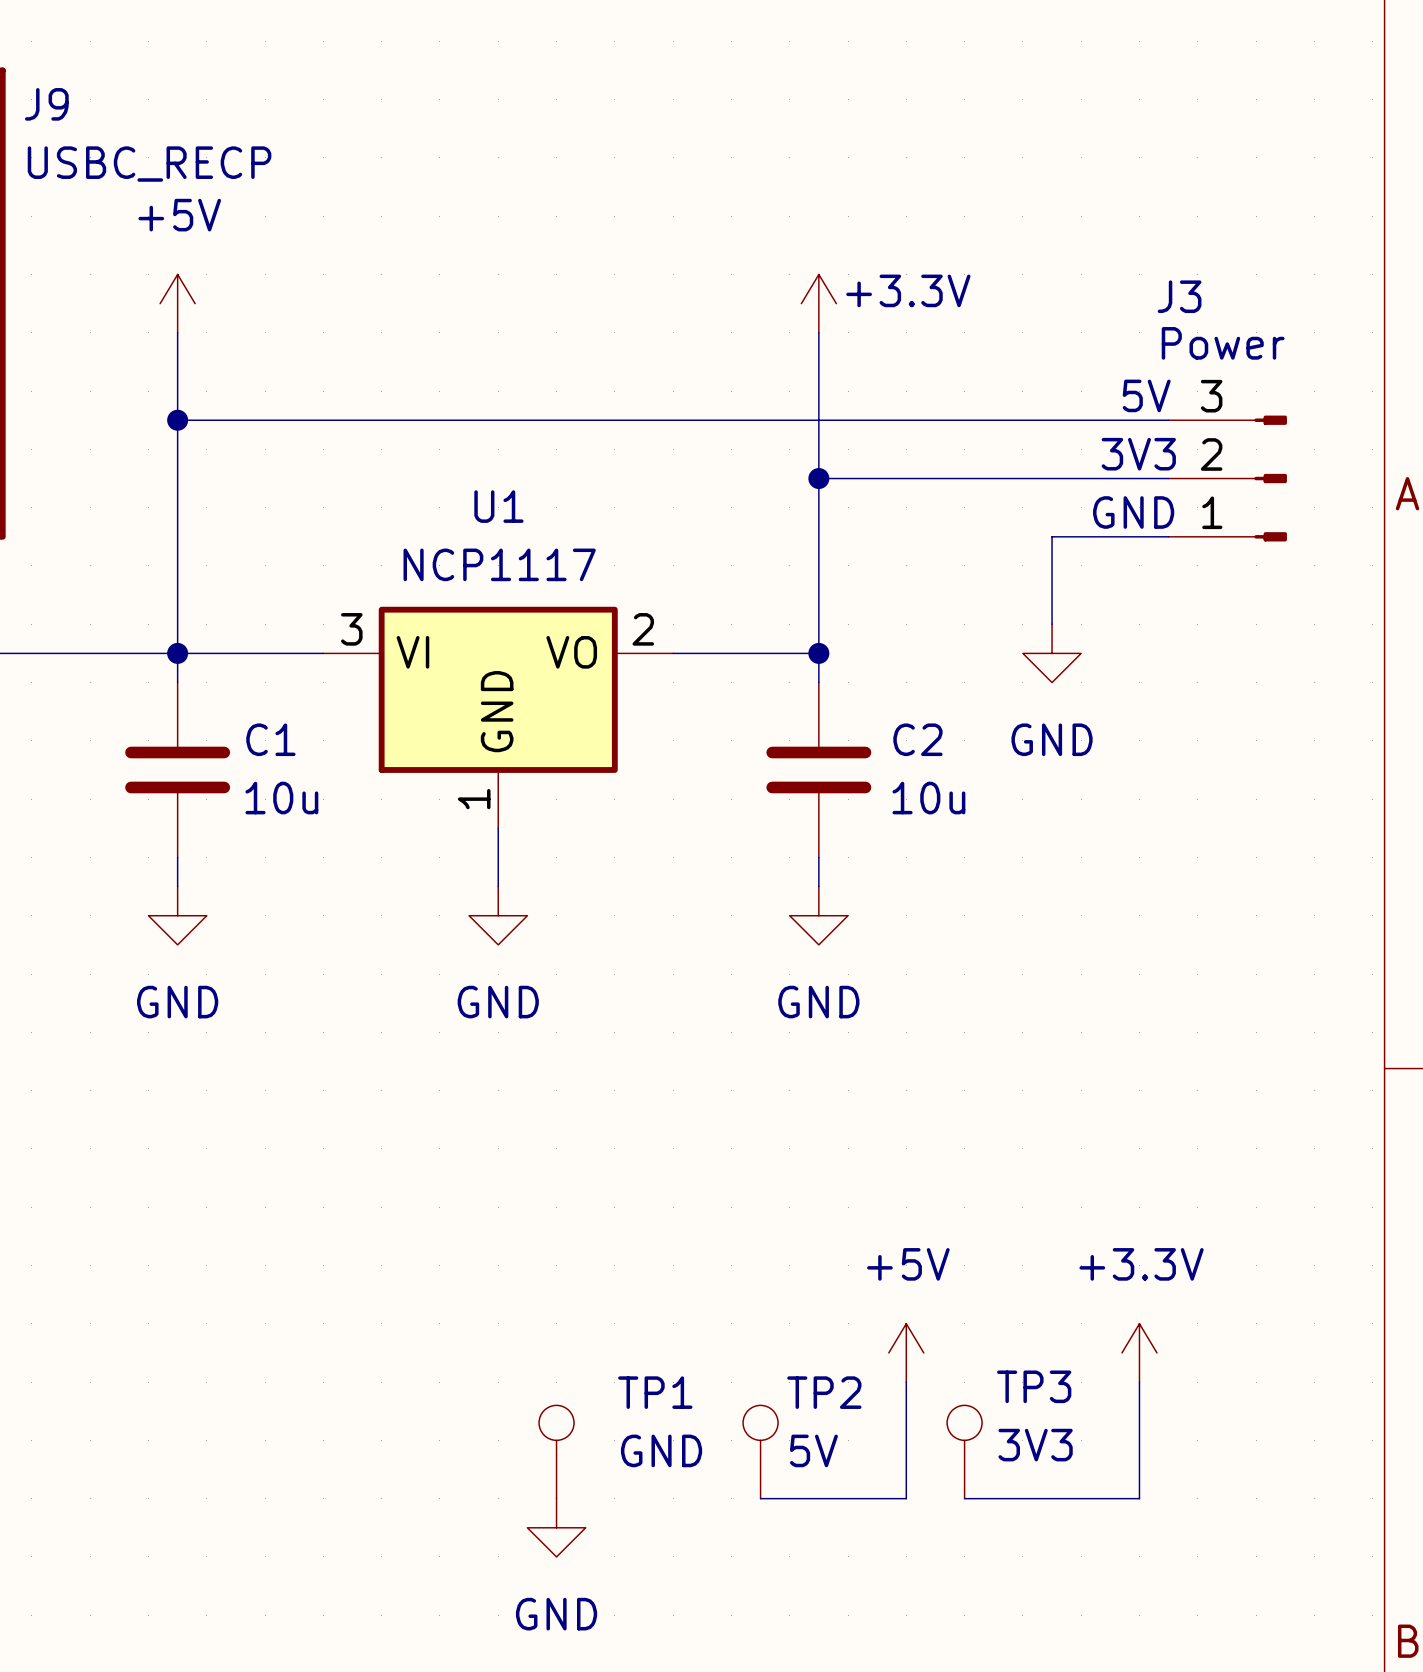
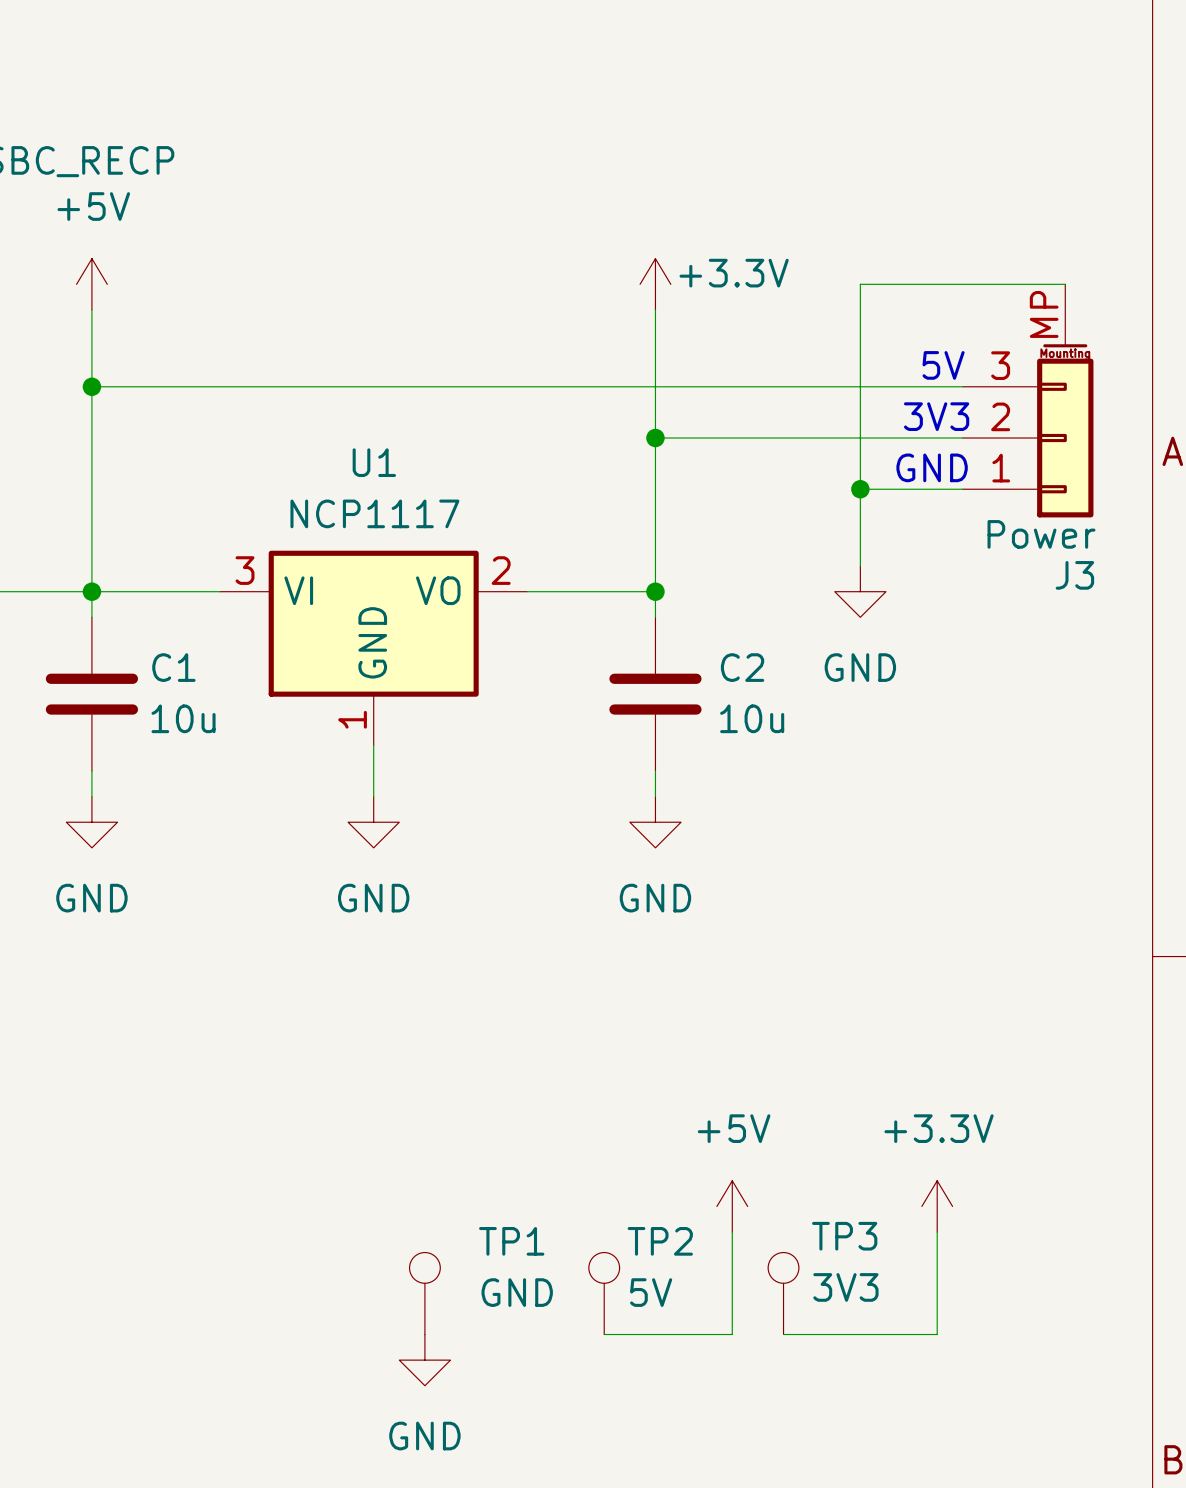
J3 name position: J3 (1179, 296) -> J3 (1074, 575)
wire: none -> (1065, 284) (860, 284) (860, 489)
J3 value position: Power (1223, 343) -> Power (1041, 534)
J3 symbol: [1168, 415, 1287, 542] -> [962, 284, 1094, 518]
junction: none -> (860, 489)

